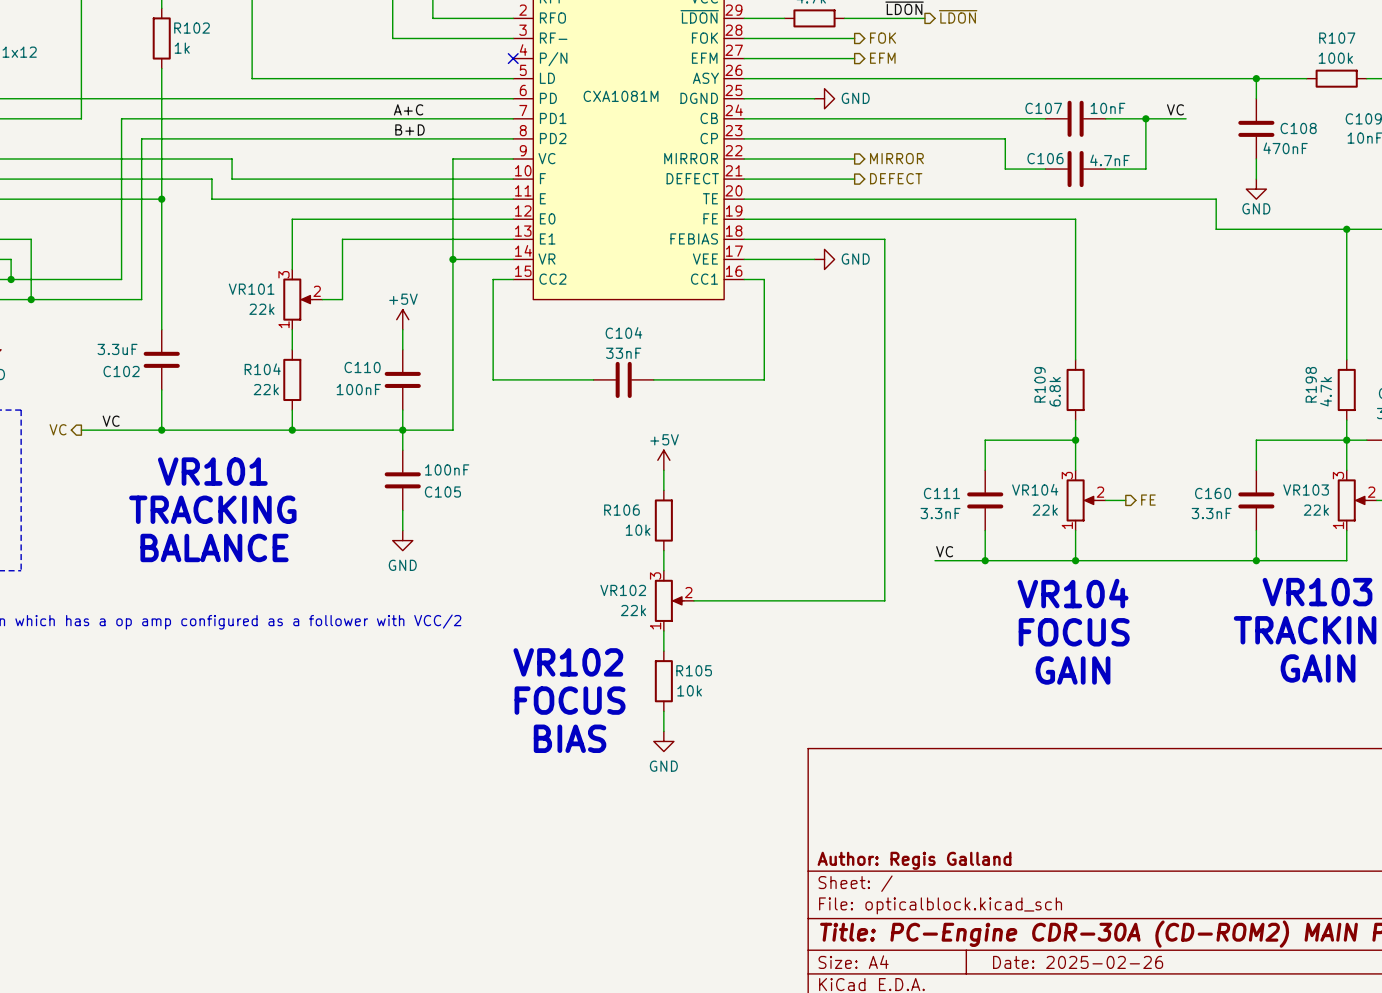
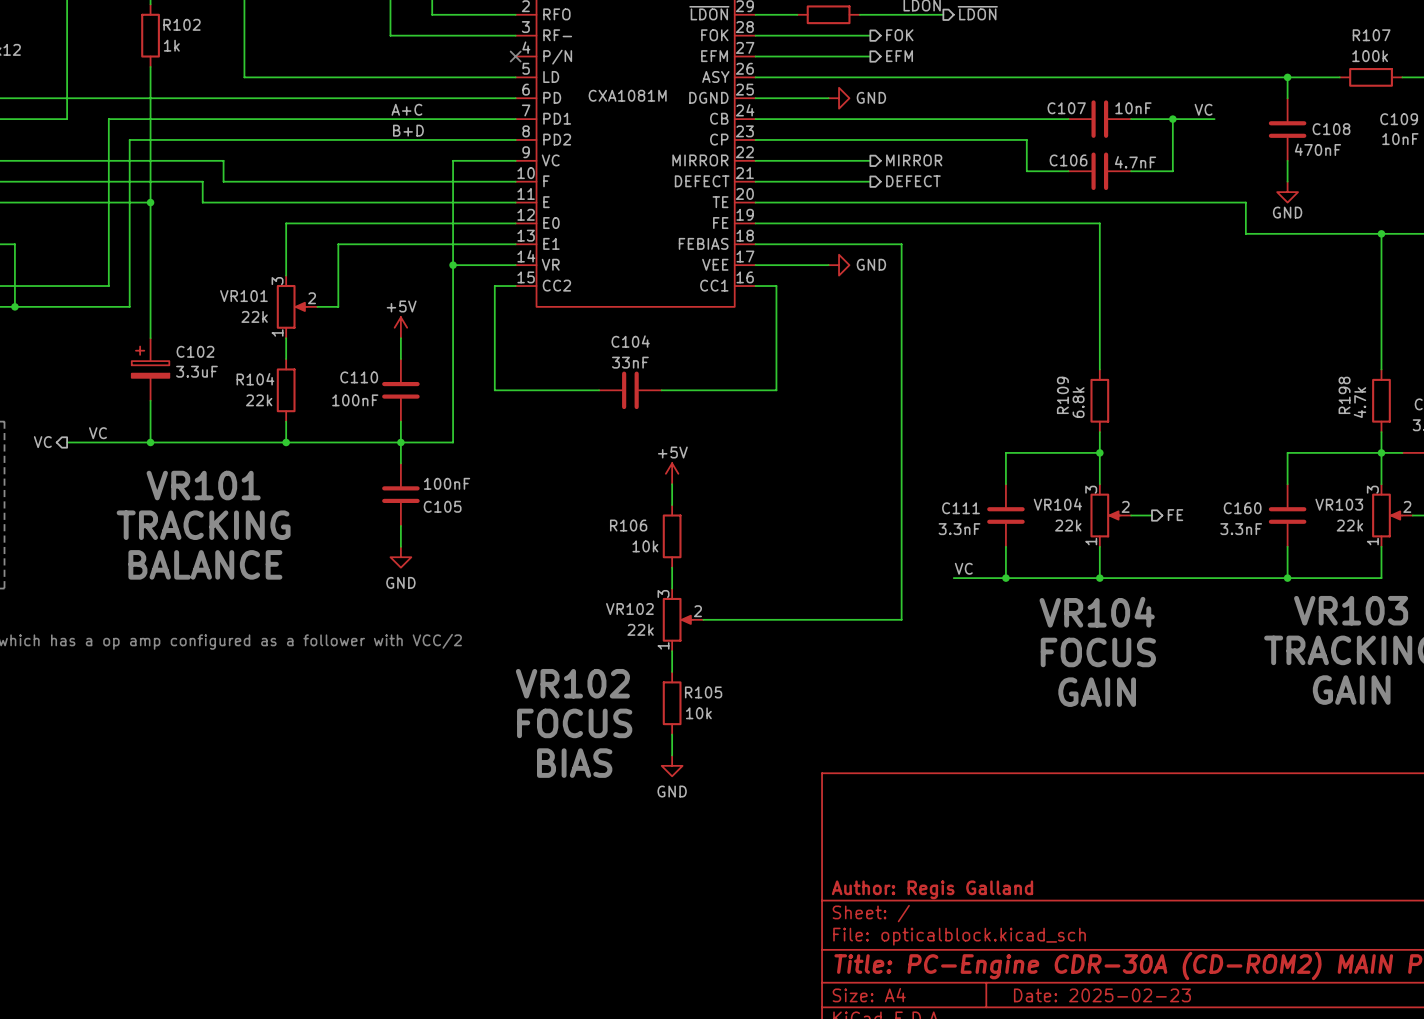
C102 symbol: [143, 329, 180, 390] -> [131, 338, 170, 401]
C102 value position: 3.3uF (117, 349) -> 3.3uF (196, 371)
C102 name position: C102 (121, 371) -> C102 (195, 351)
title block: Date: 2025-02-26 (1078, 962) -> Date: 2025-02-23 (1102, 995)

